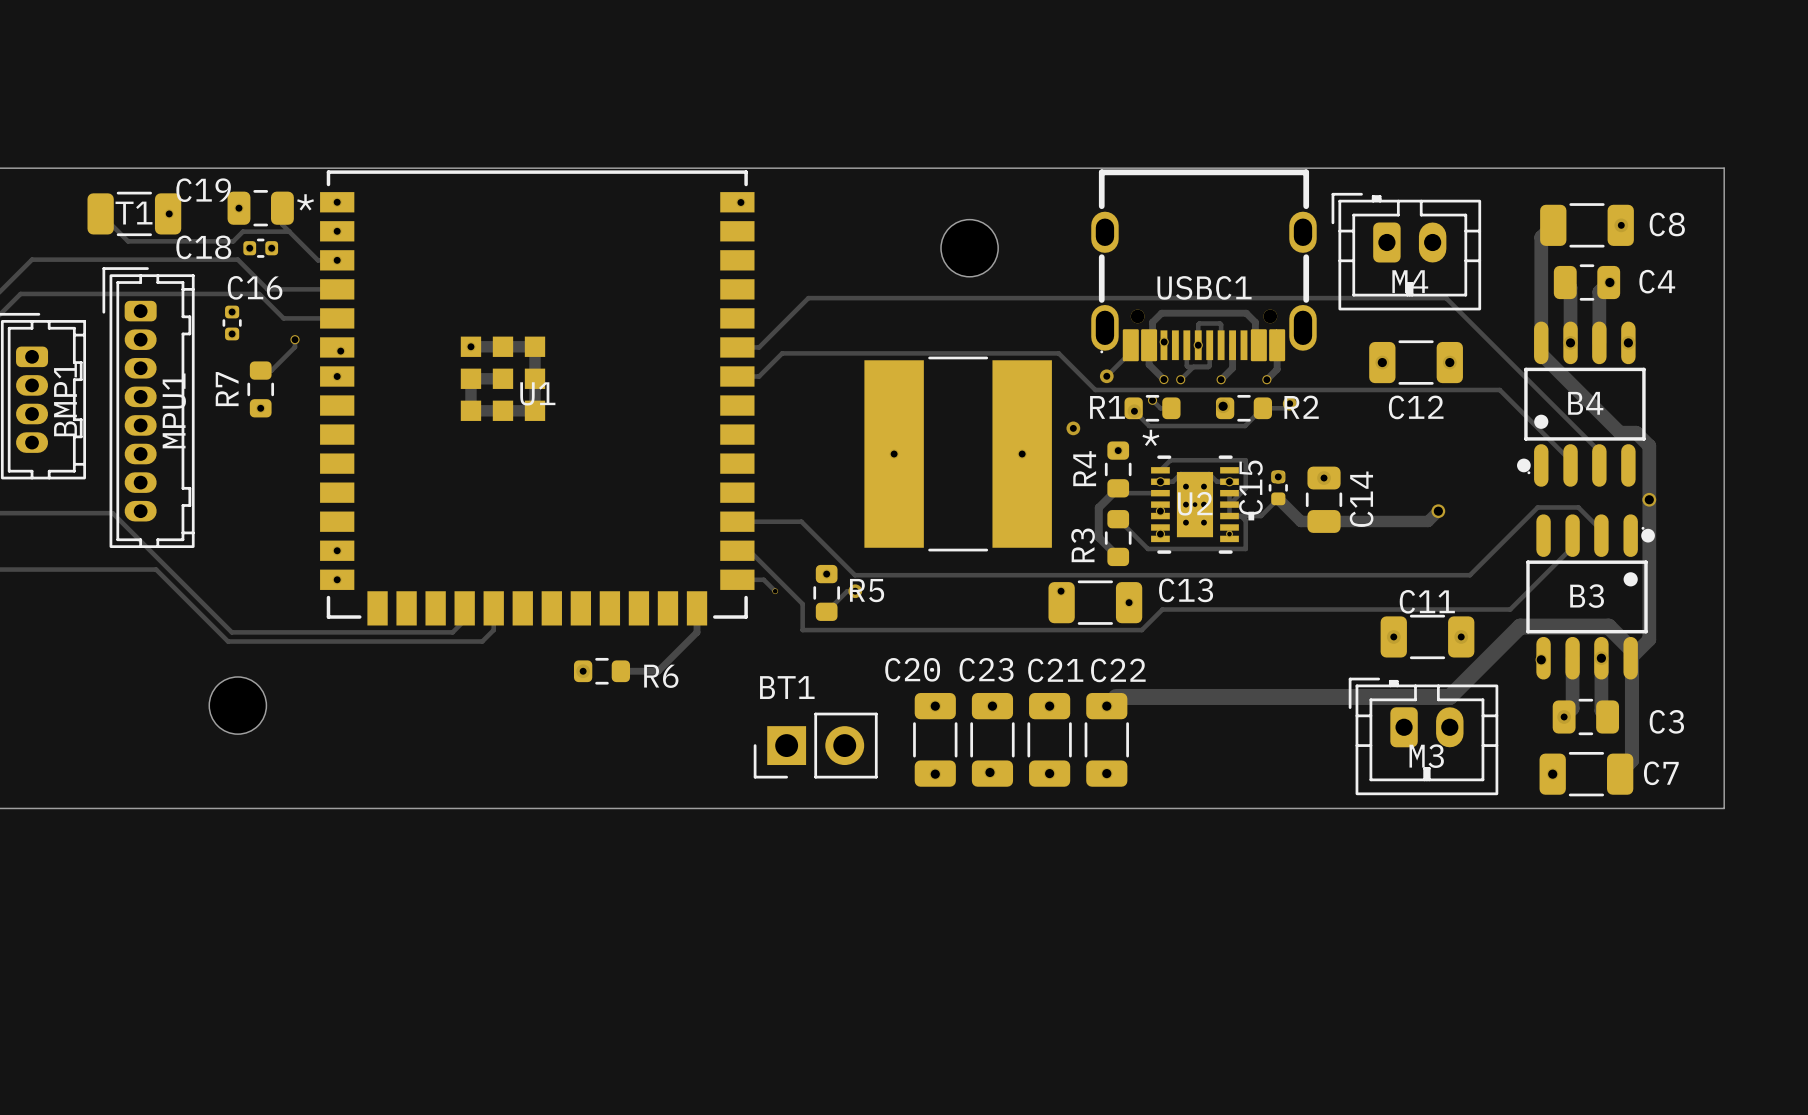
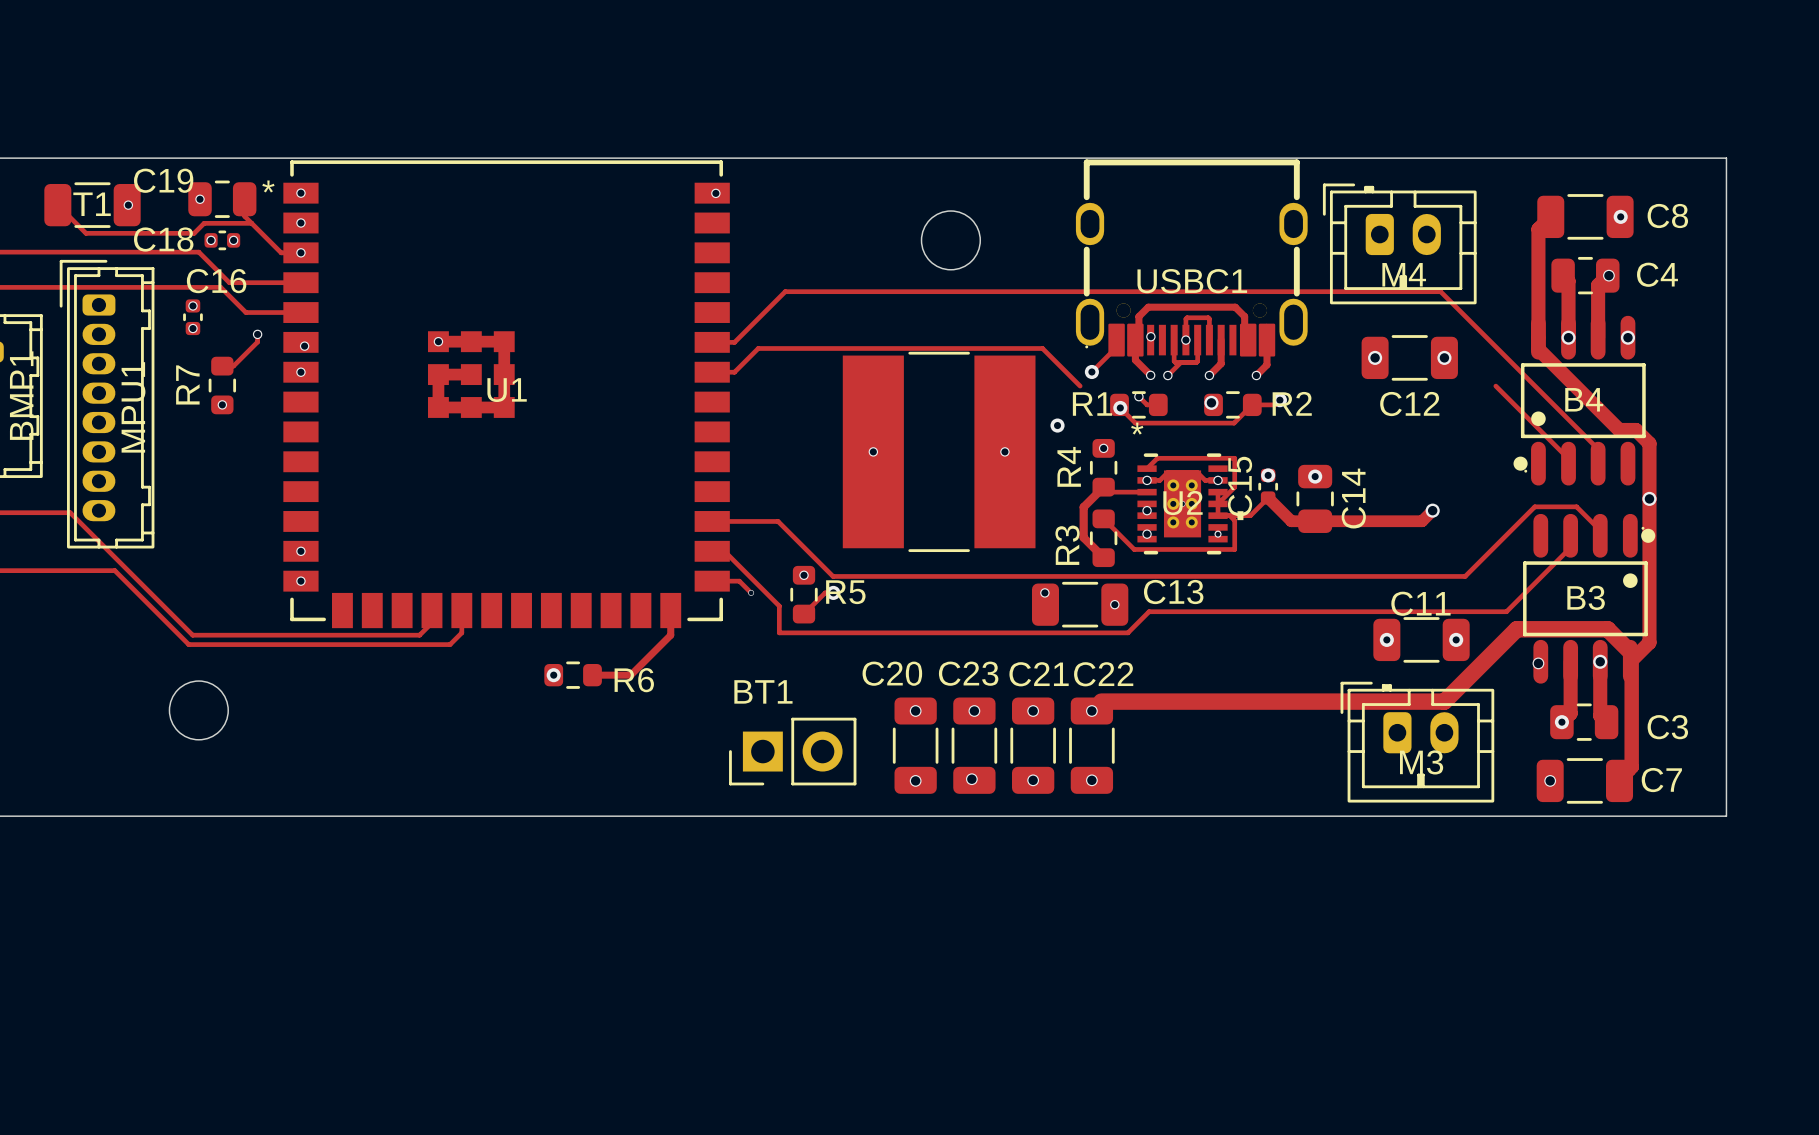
track: (1095, 389) (1499, 389) -> none

